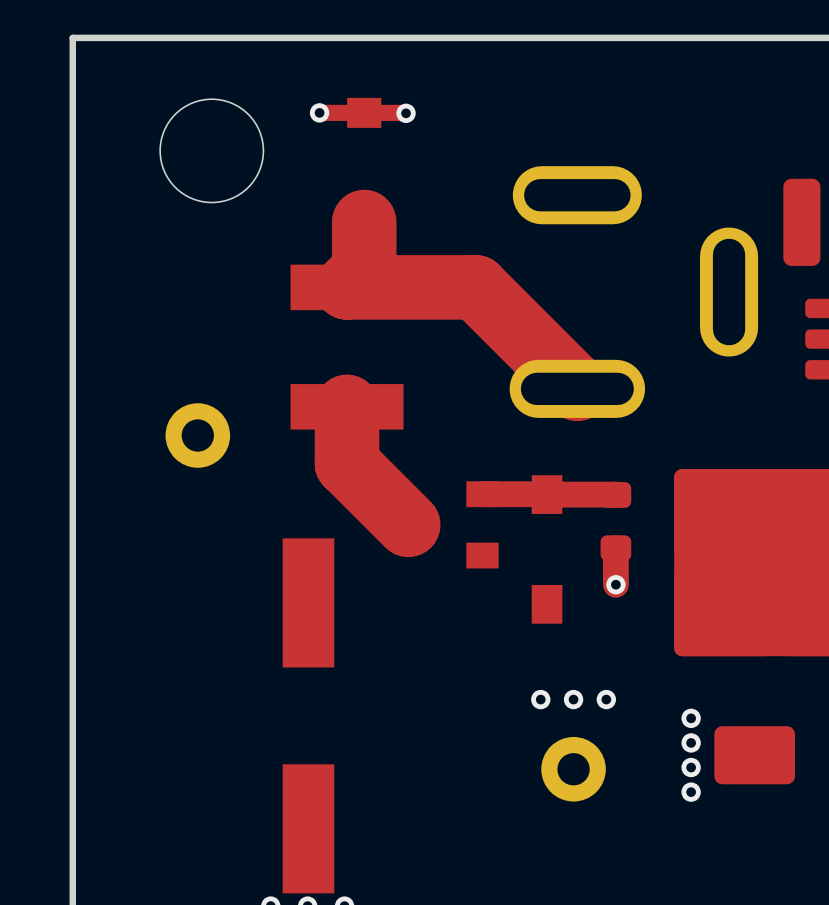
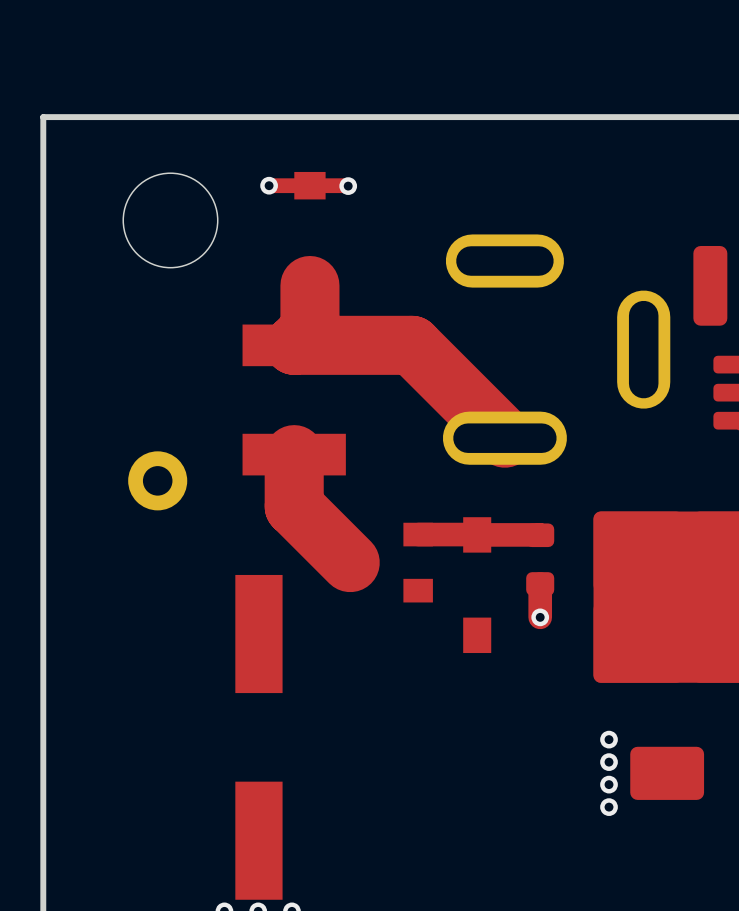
via: (540, 699) -> none
via: (573, 699) -> none
via: (606, 699) -> none
part: (573, 769) -> none

